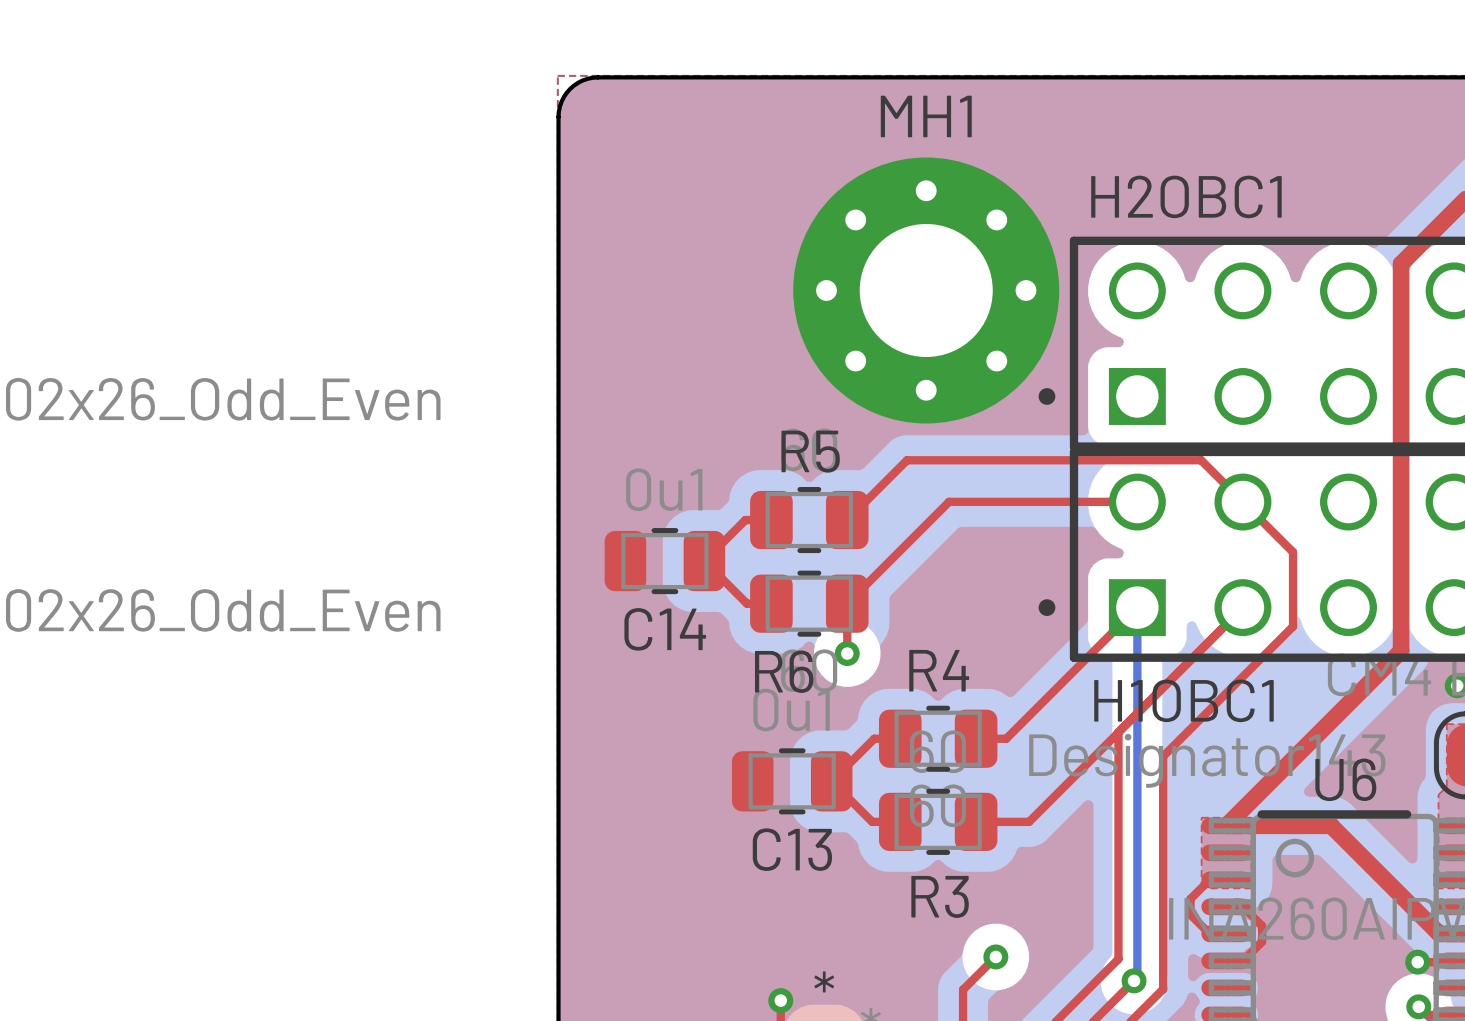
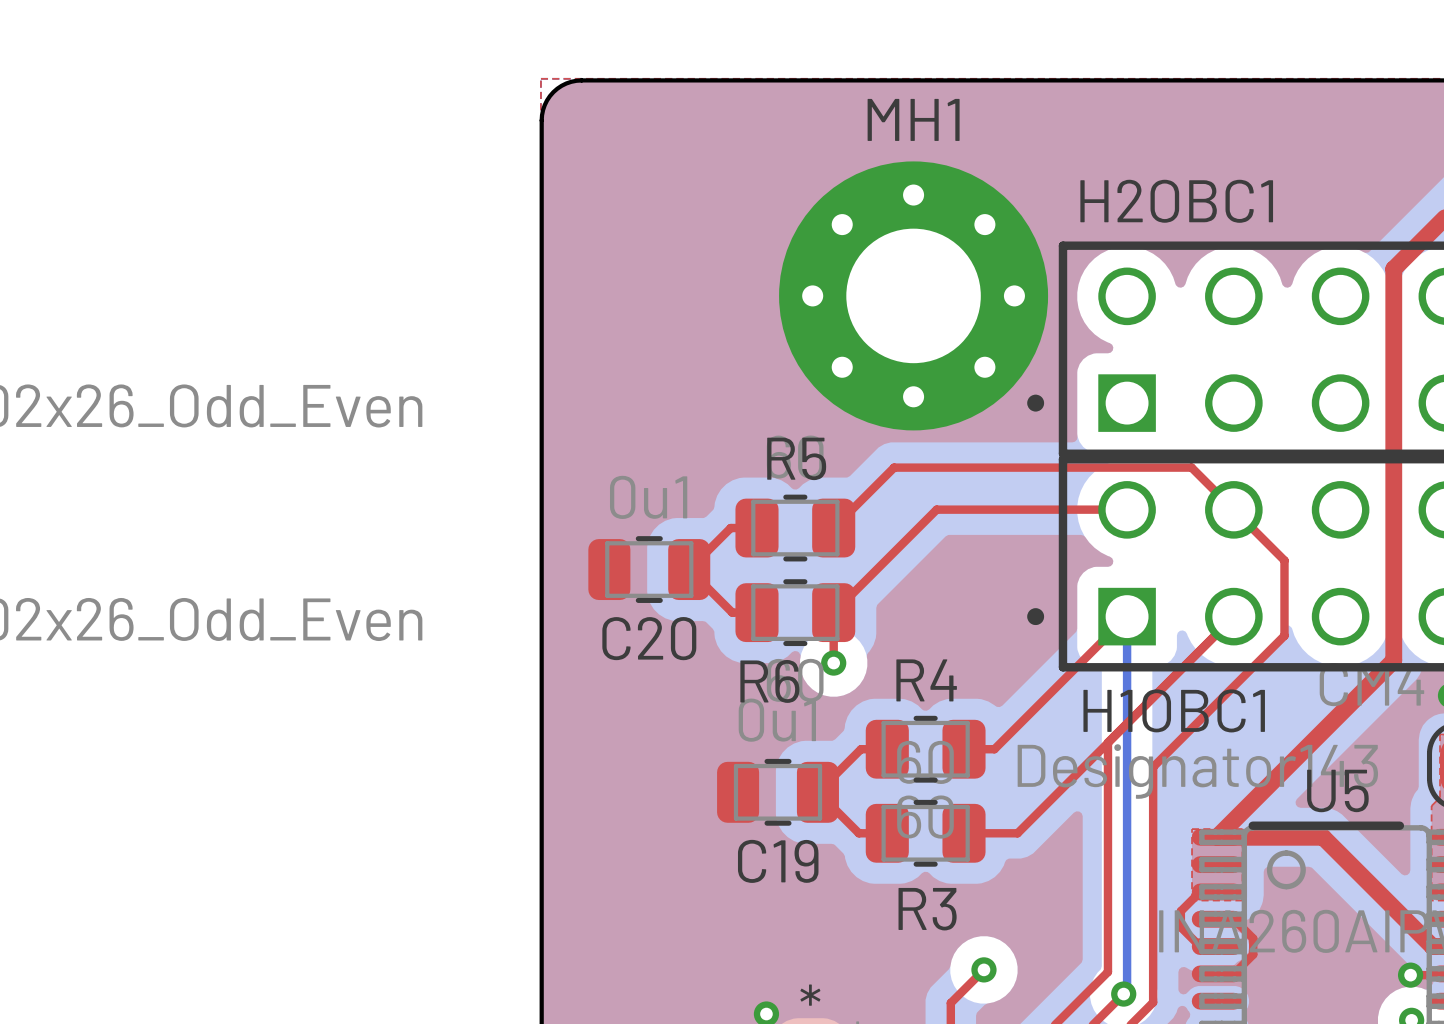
C14 name: C14 (665, 629) -> C20 (649, 638)
U6 name: U6 (1345, 779) -> U5 (1337, 790)
C13 name: C13 (792, 849) -> C19 (778, 861)

